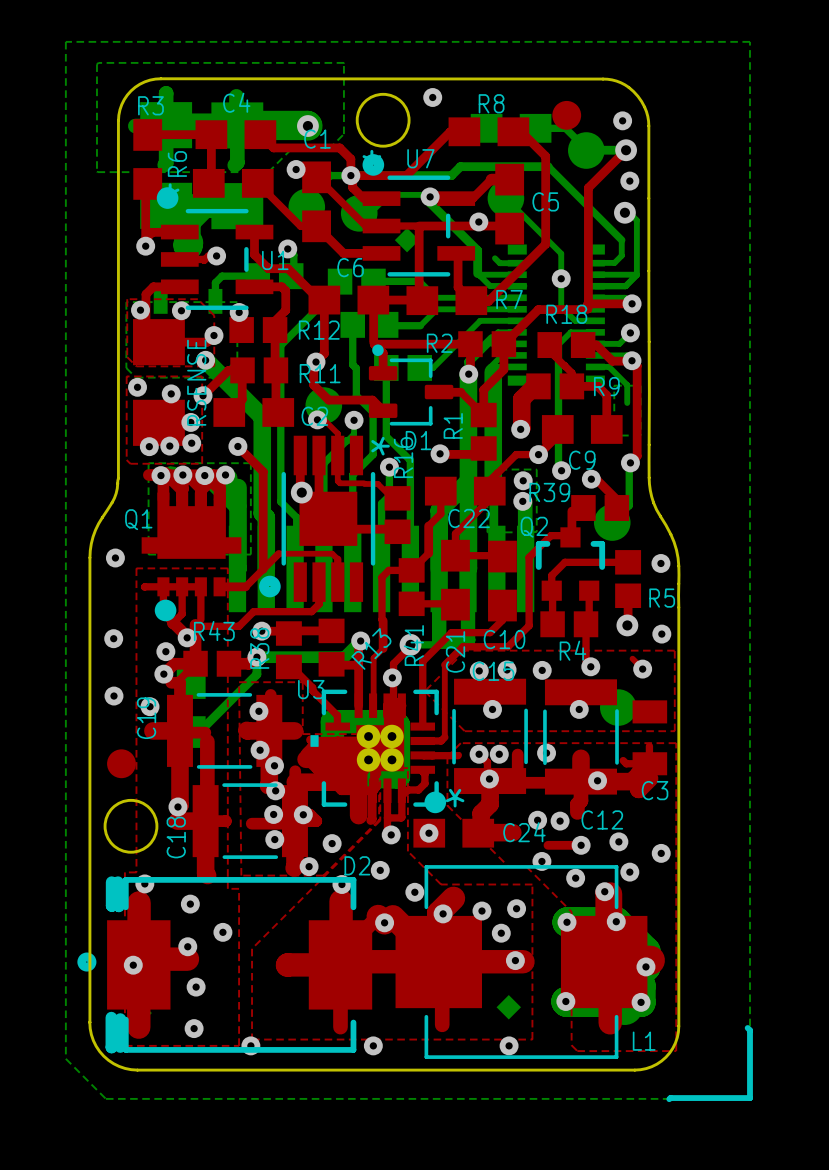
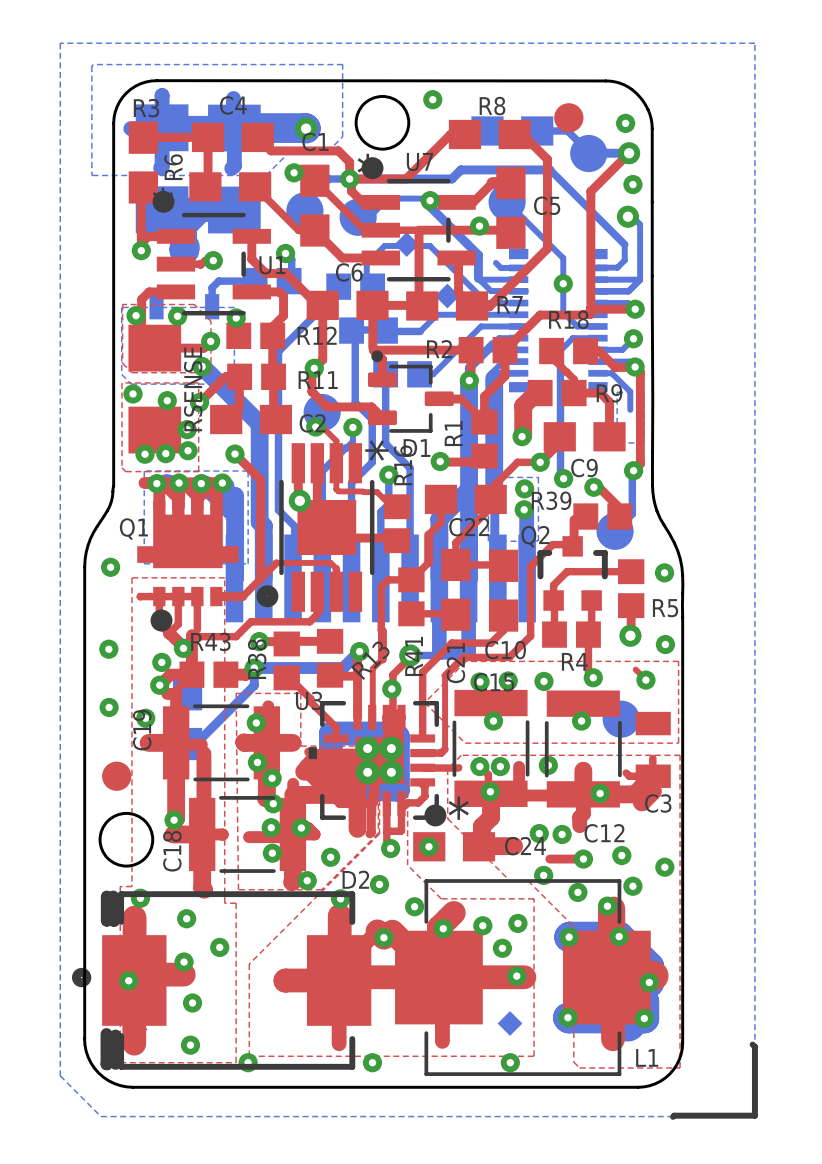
bottom track: (373, 281) (419, 281) (436, 297) (486, 297) -> (366, 286) (366, 263) (384, 246) (429, 246) (487, 303)
part: none -> (447, 296)
bottom track: (352, 324) (352, 364) (356, 368) -> (386, 329) (362, 329) (355, 336) (355, 374)

